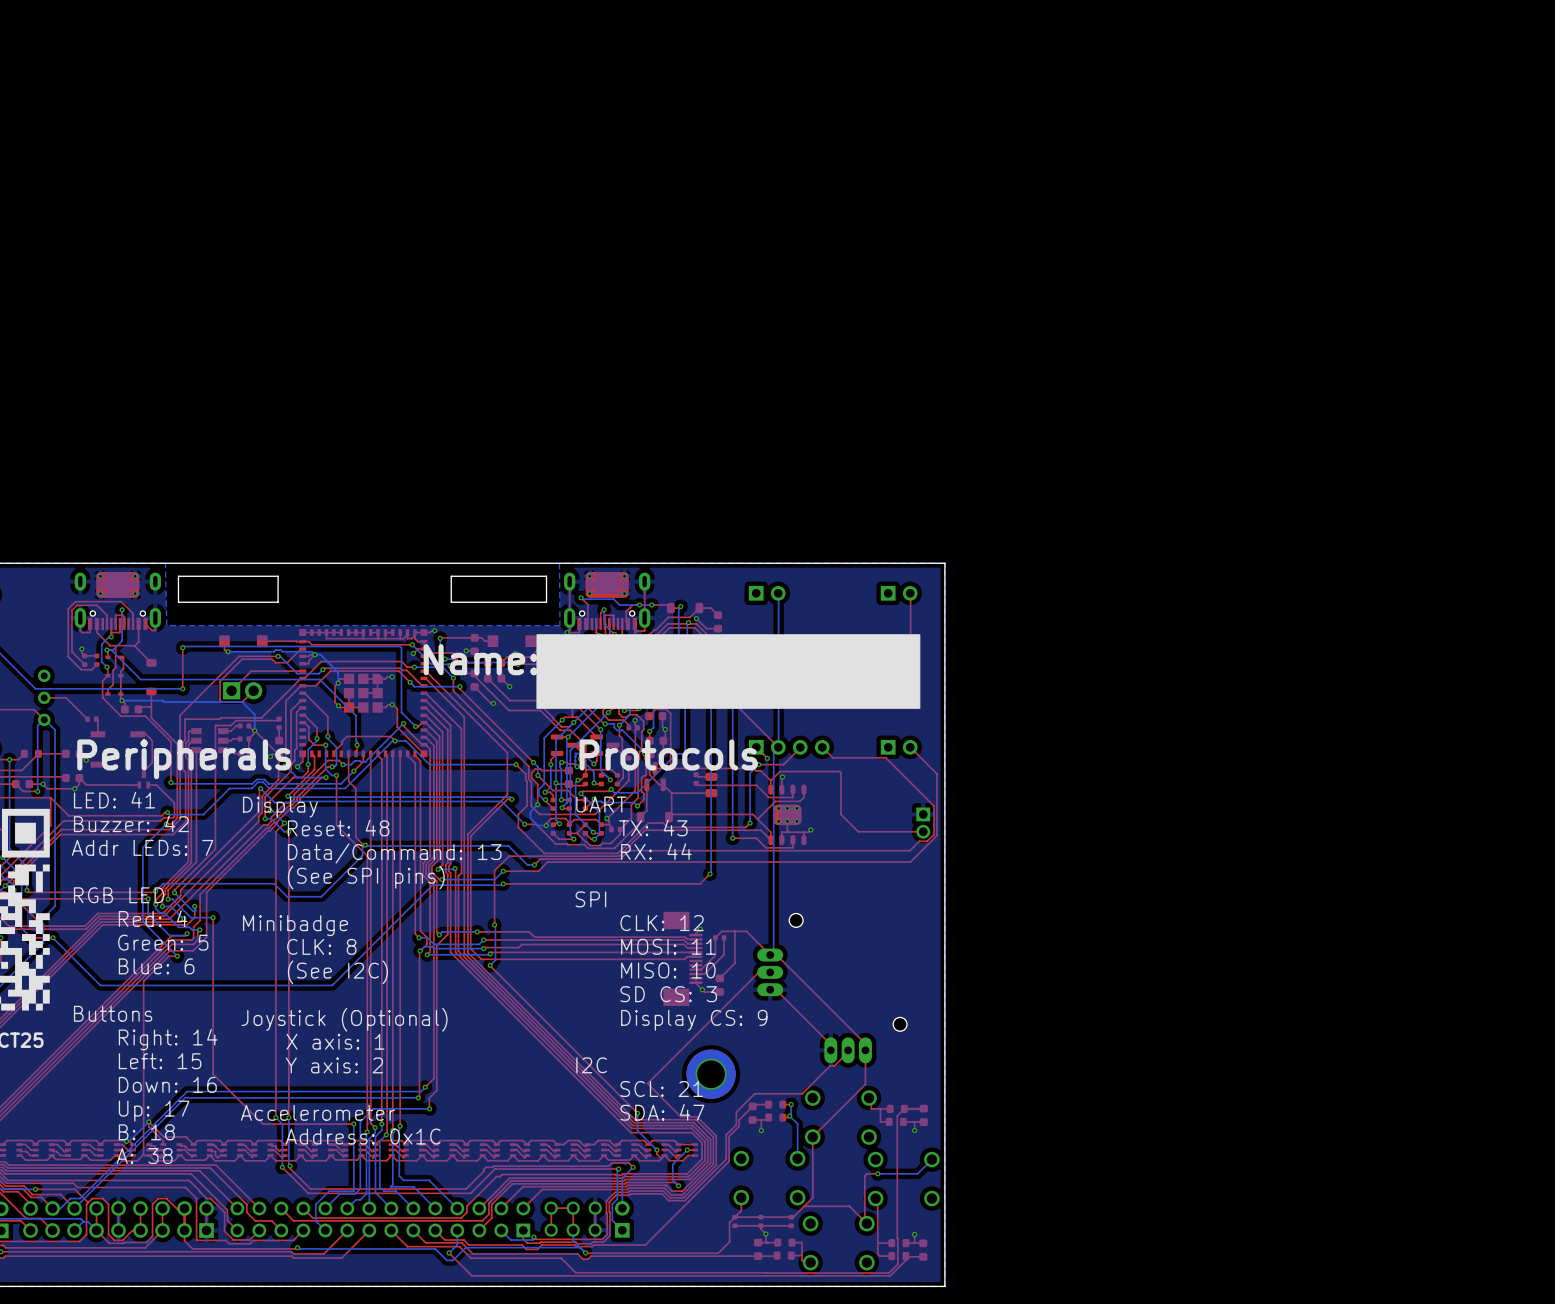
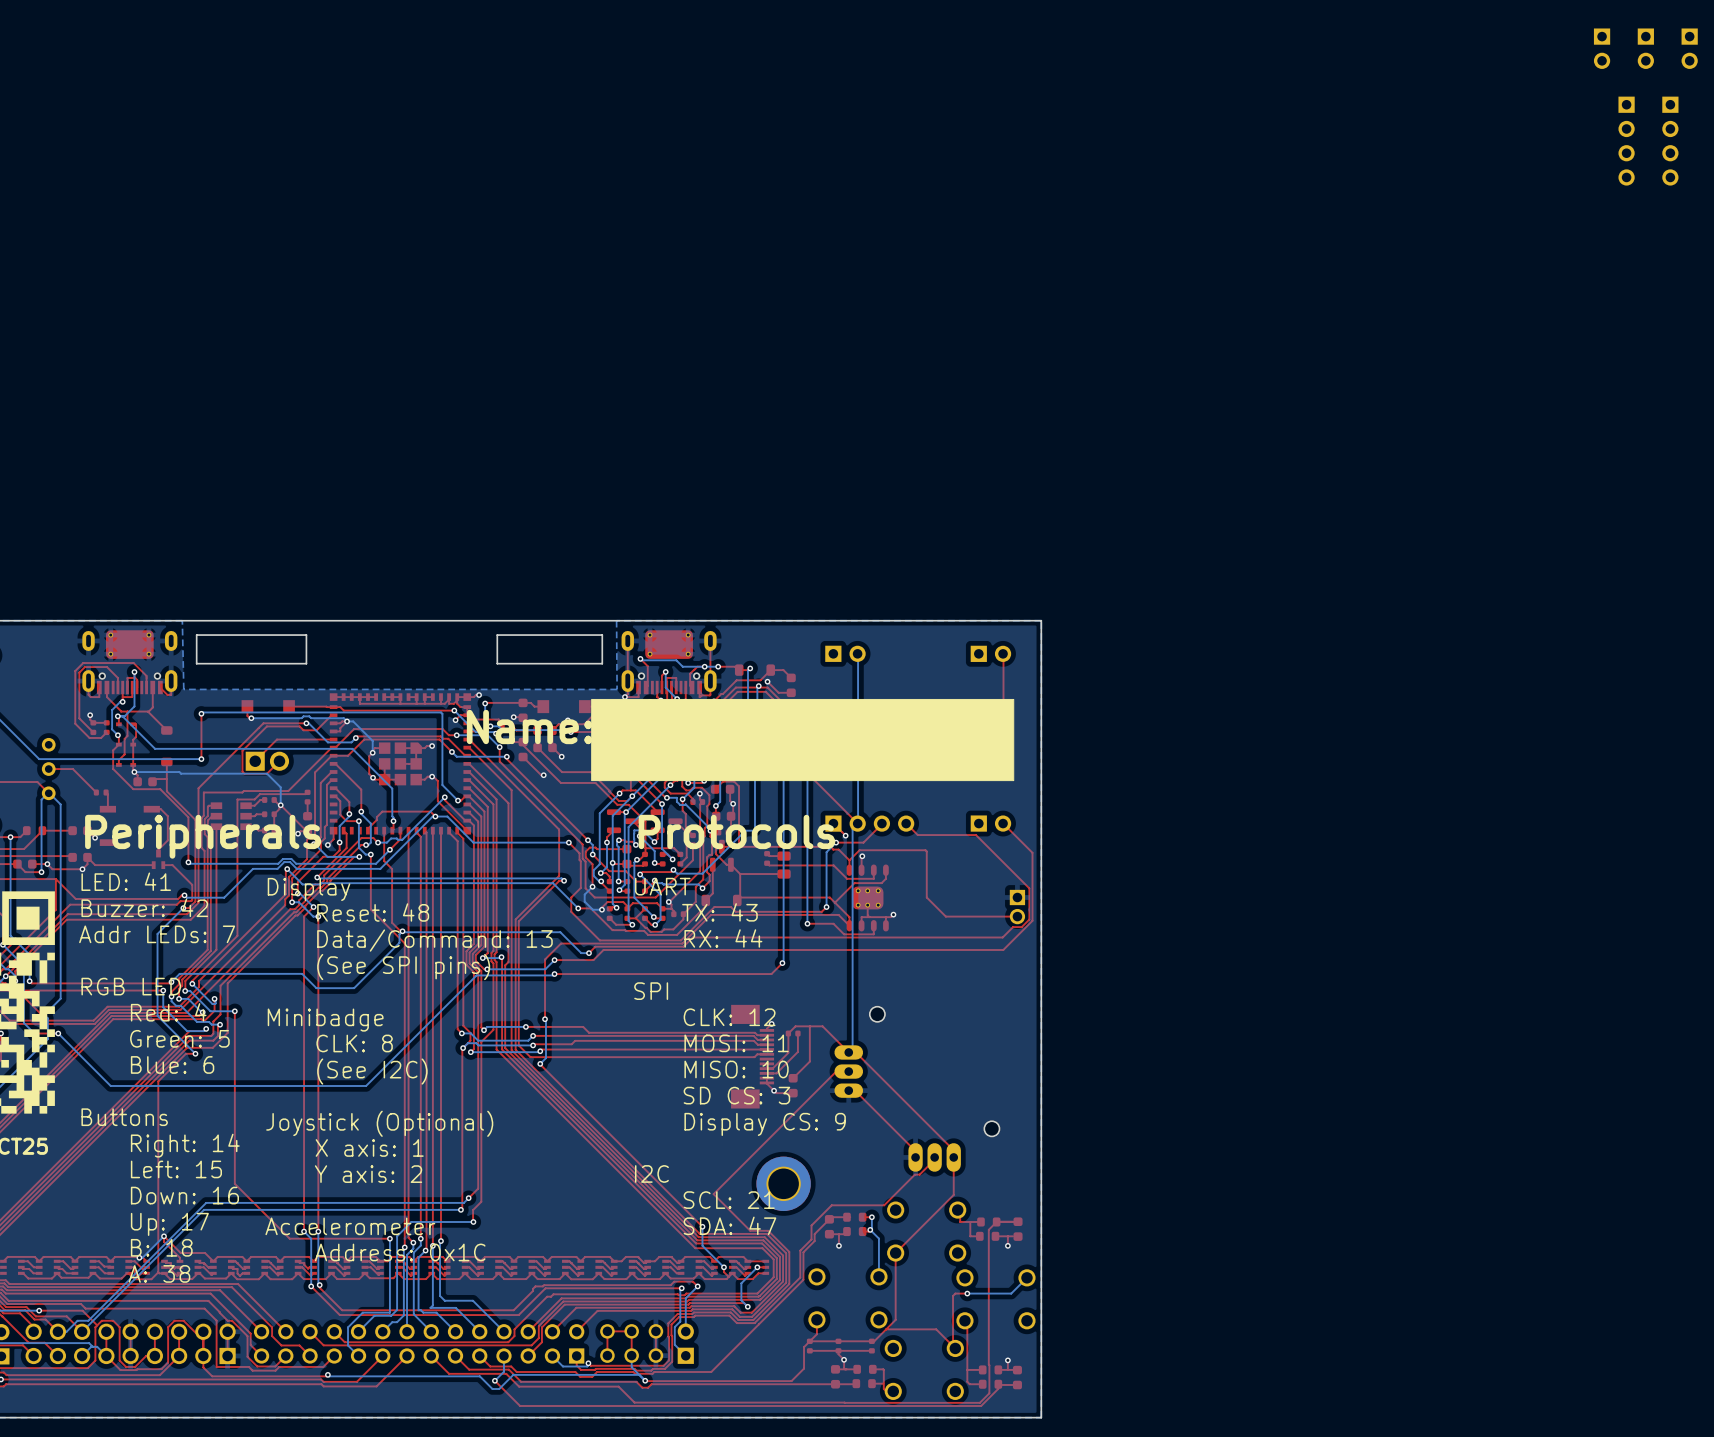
part: none -> (1602, 48)
part: none -> (1645, 48)
part: none -> (1689, 48)
part: none -> (1626, 141)
part: none -> (1670, 141)

